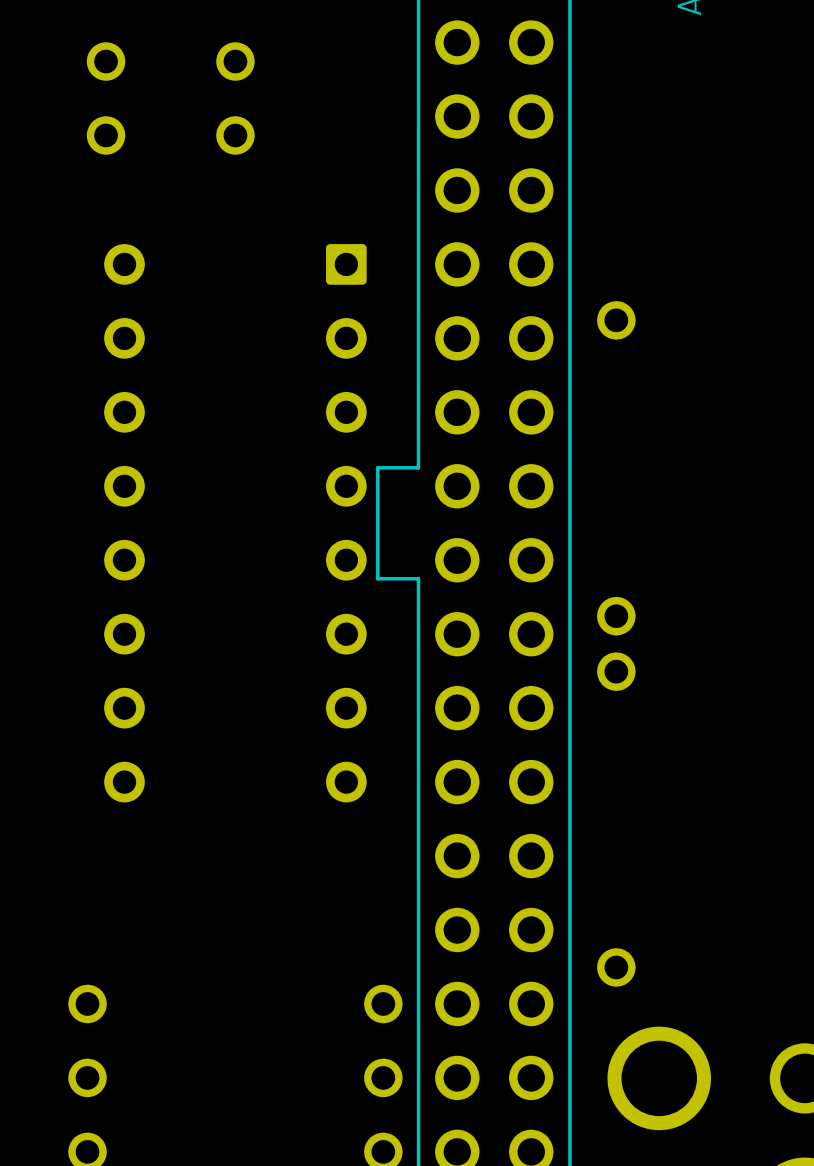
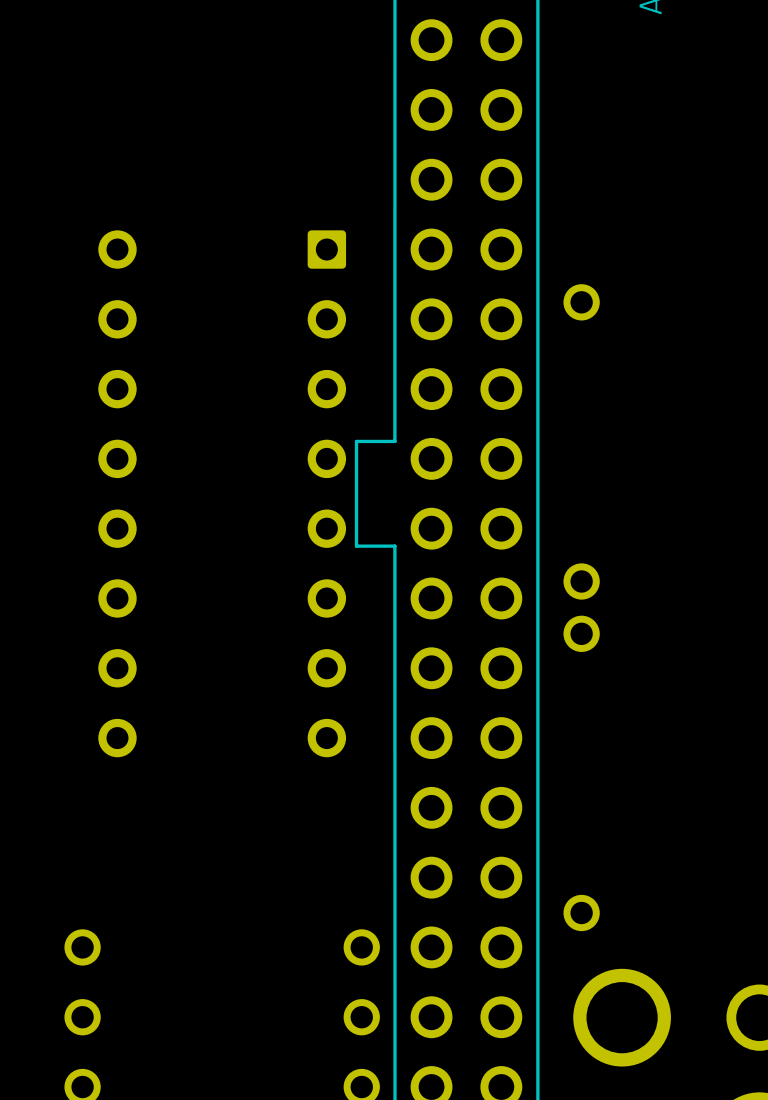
part: (106, 98) -> none
part: (235, 98) -> none

